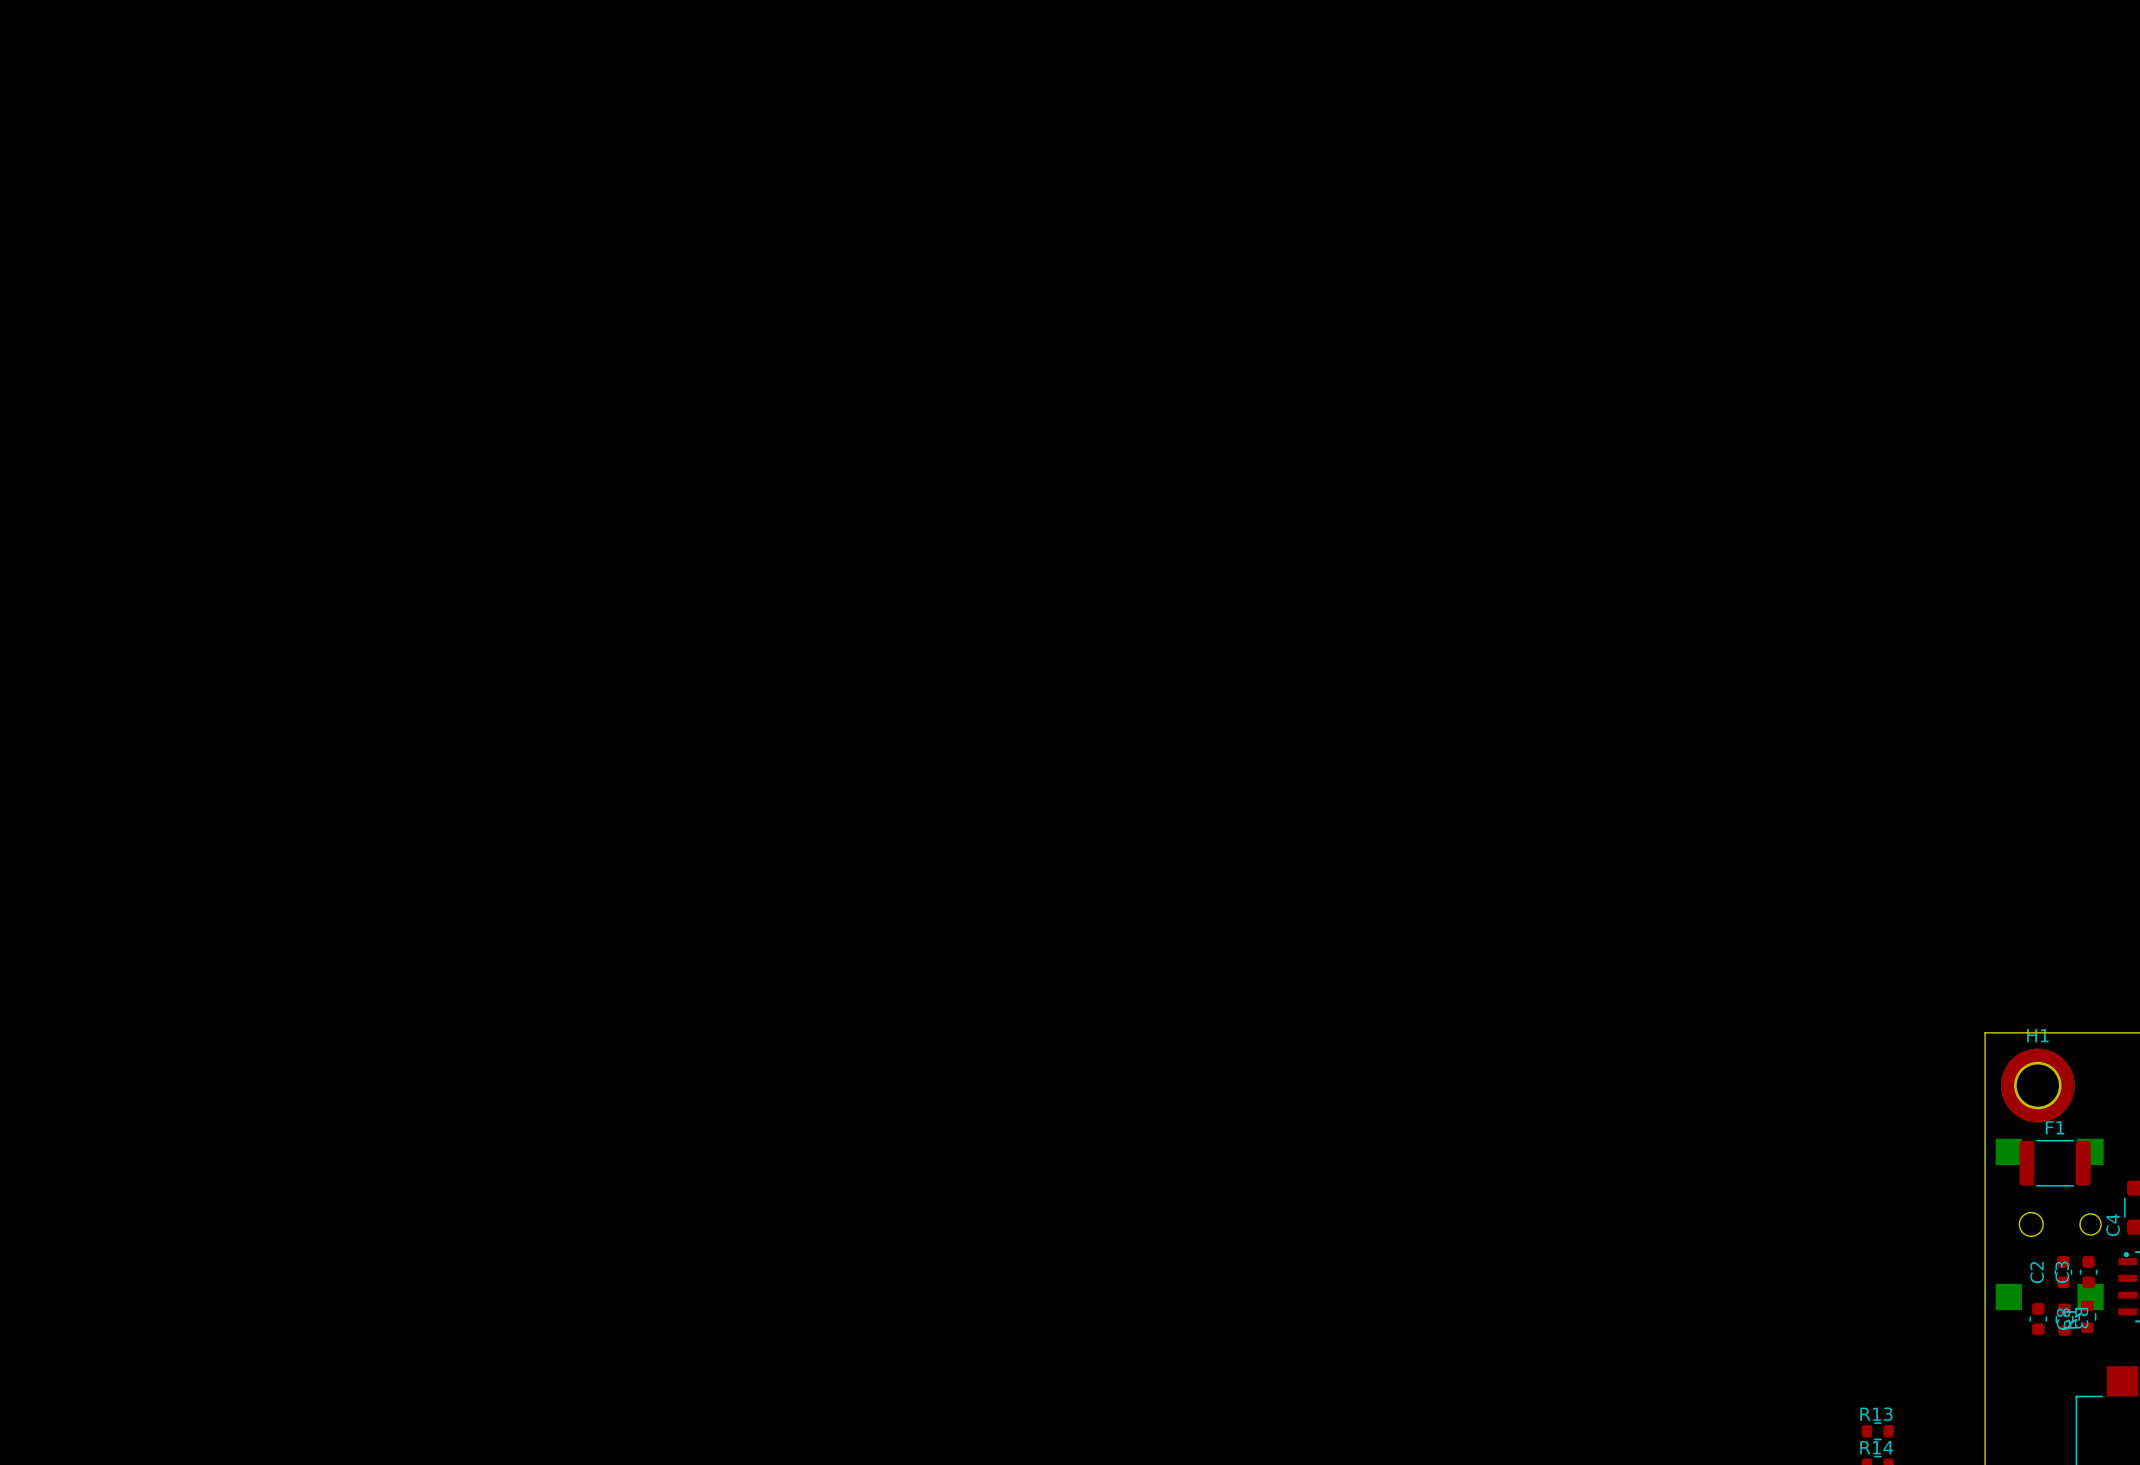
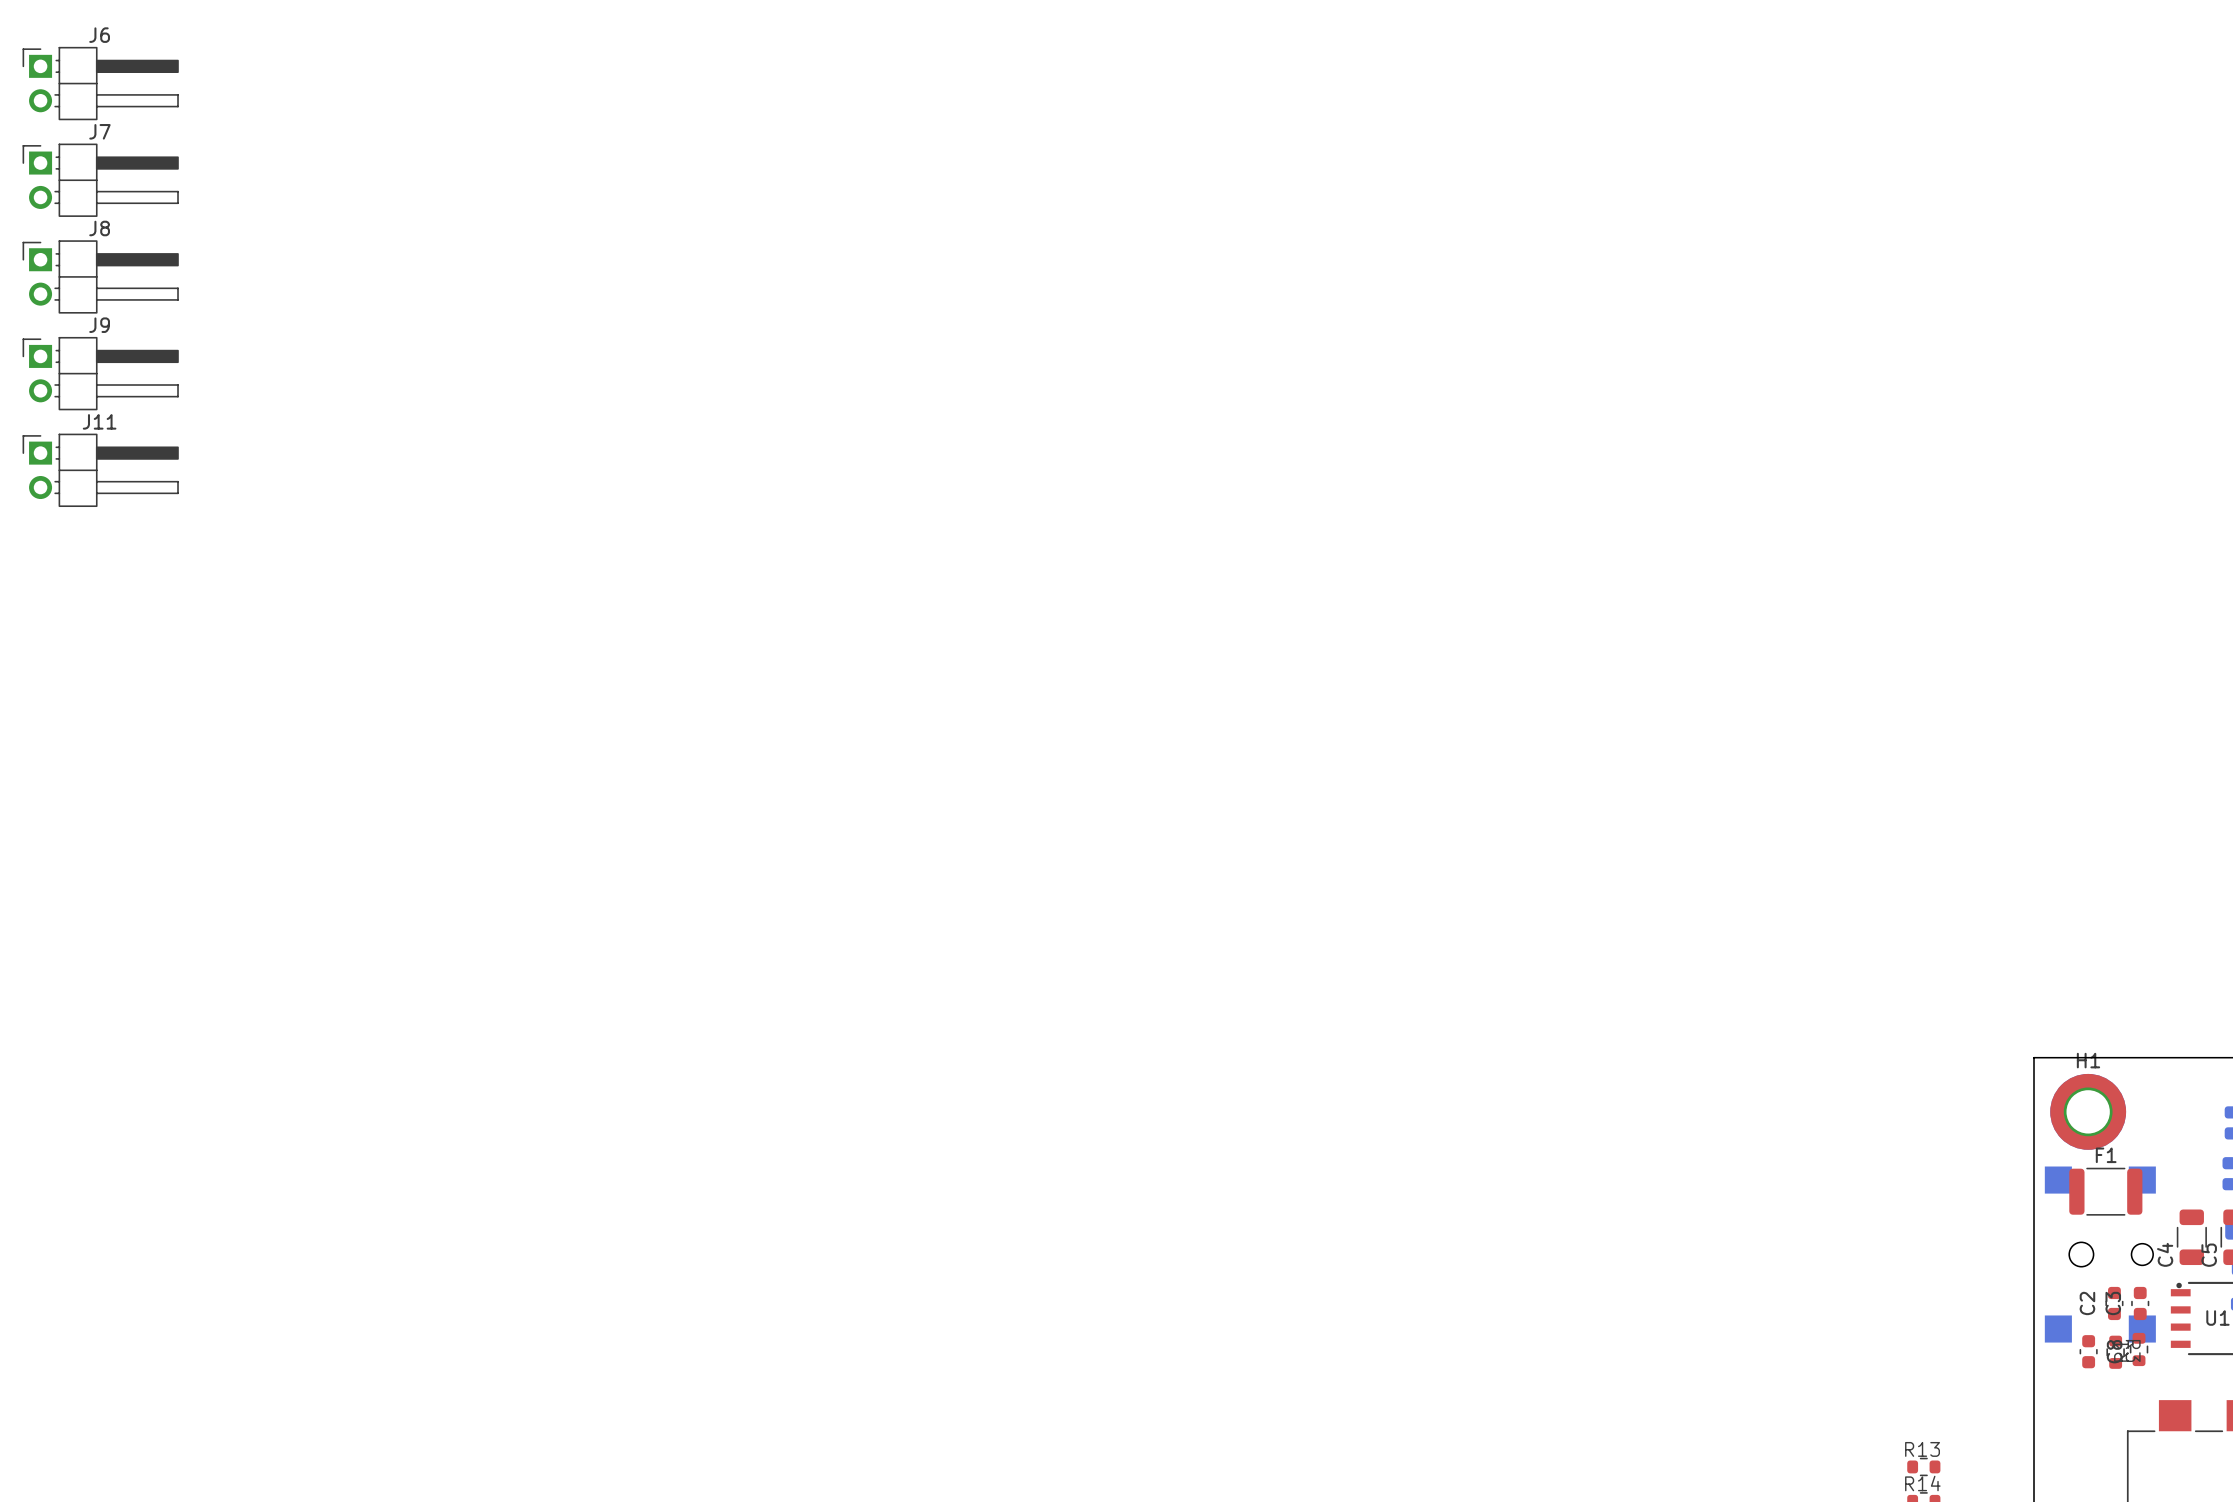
J6: none -> (100, 83)
J7: none -> (100, 180)
J8: none -> (100, 276)
J9: none -> (100, 373)
J11: none -> (100, 470)

